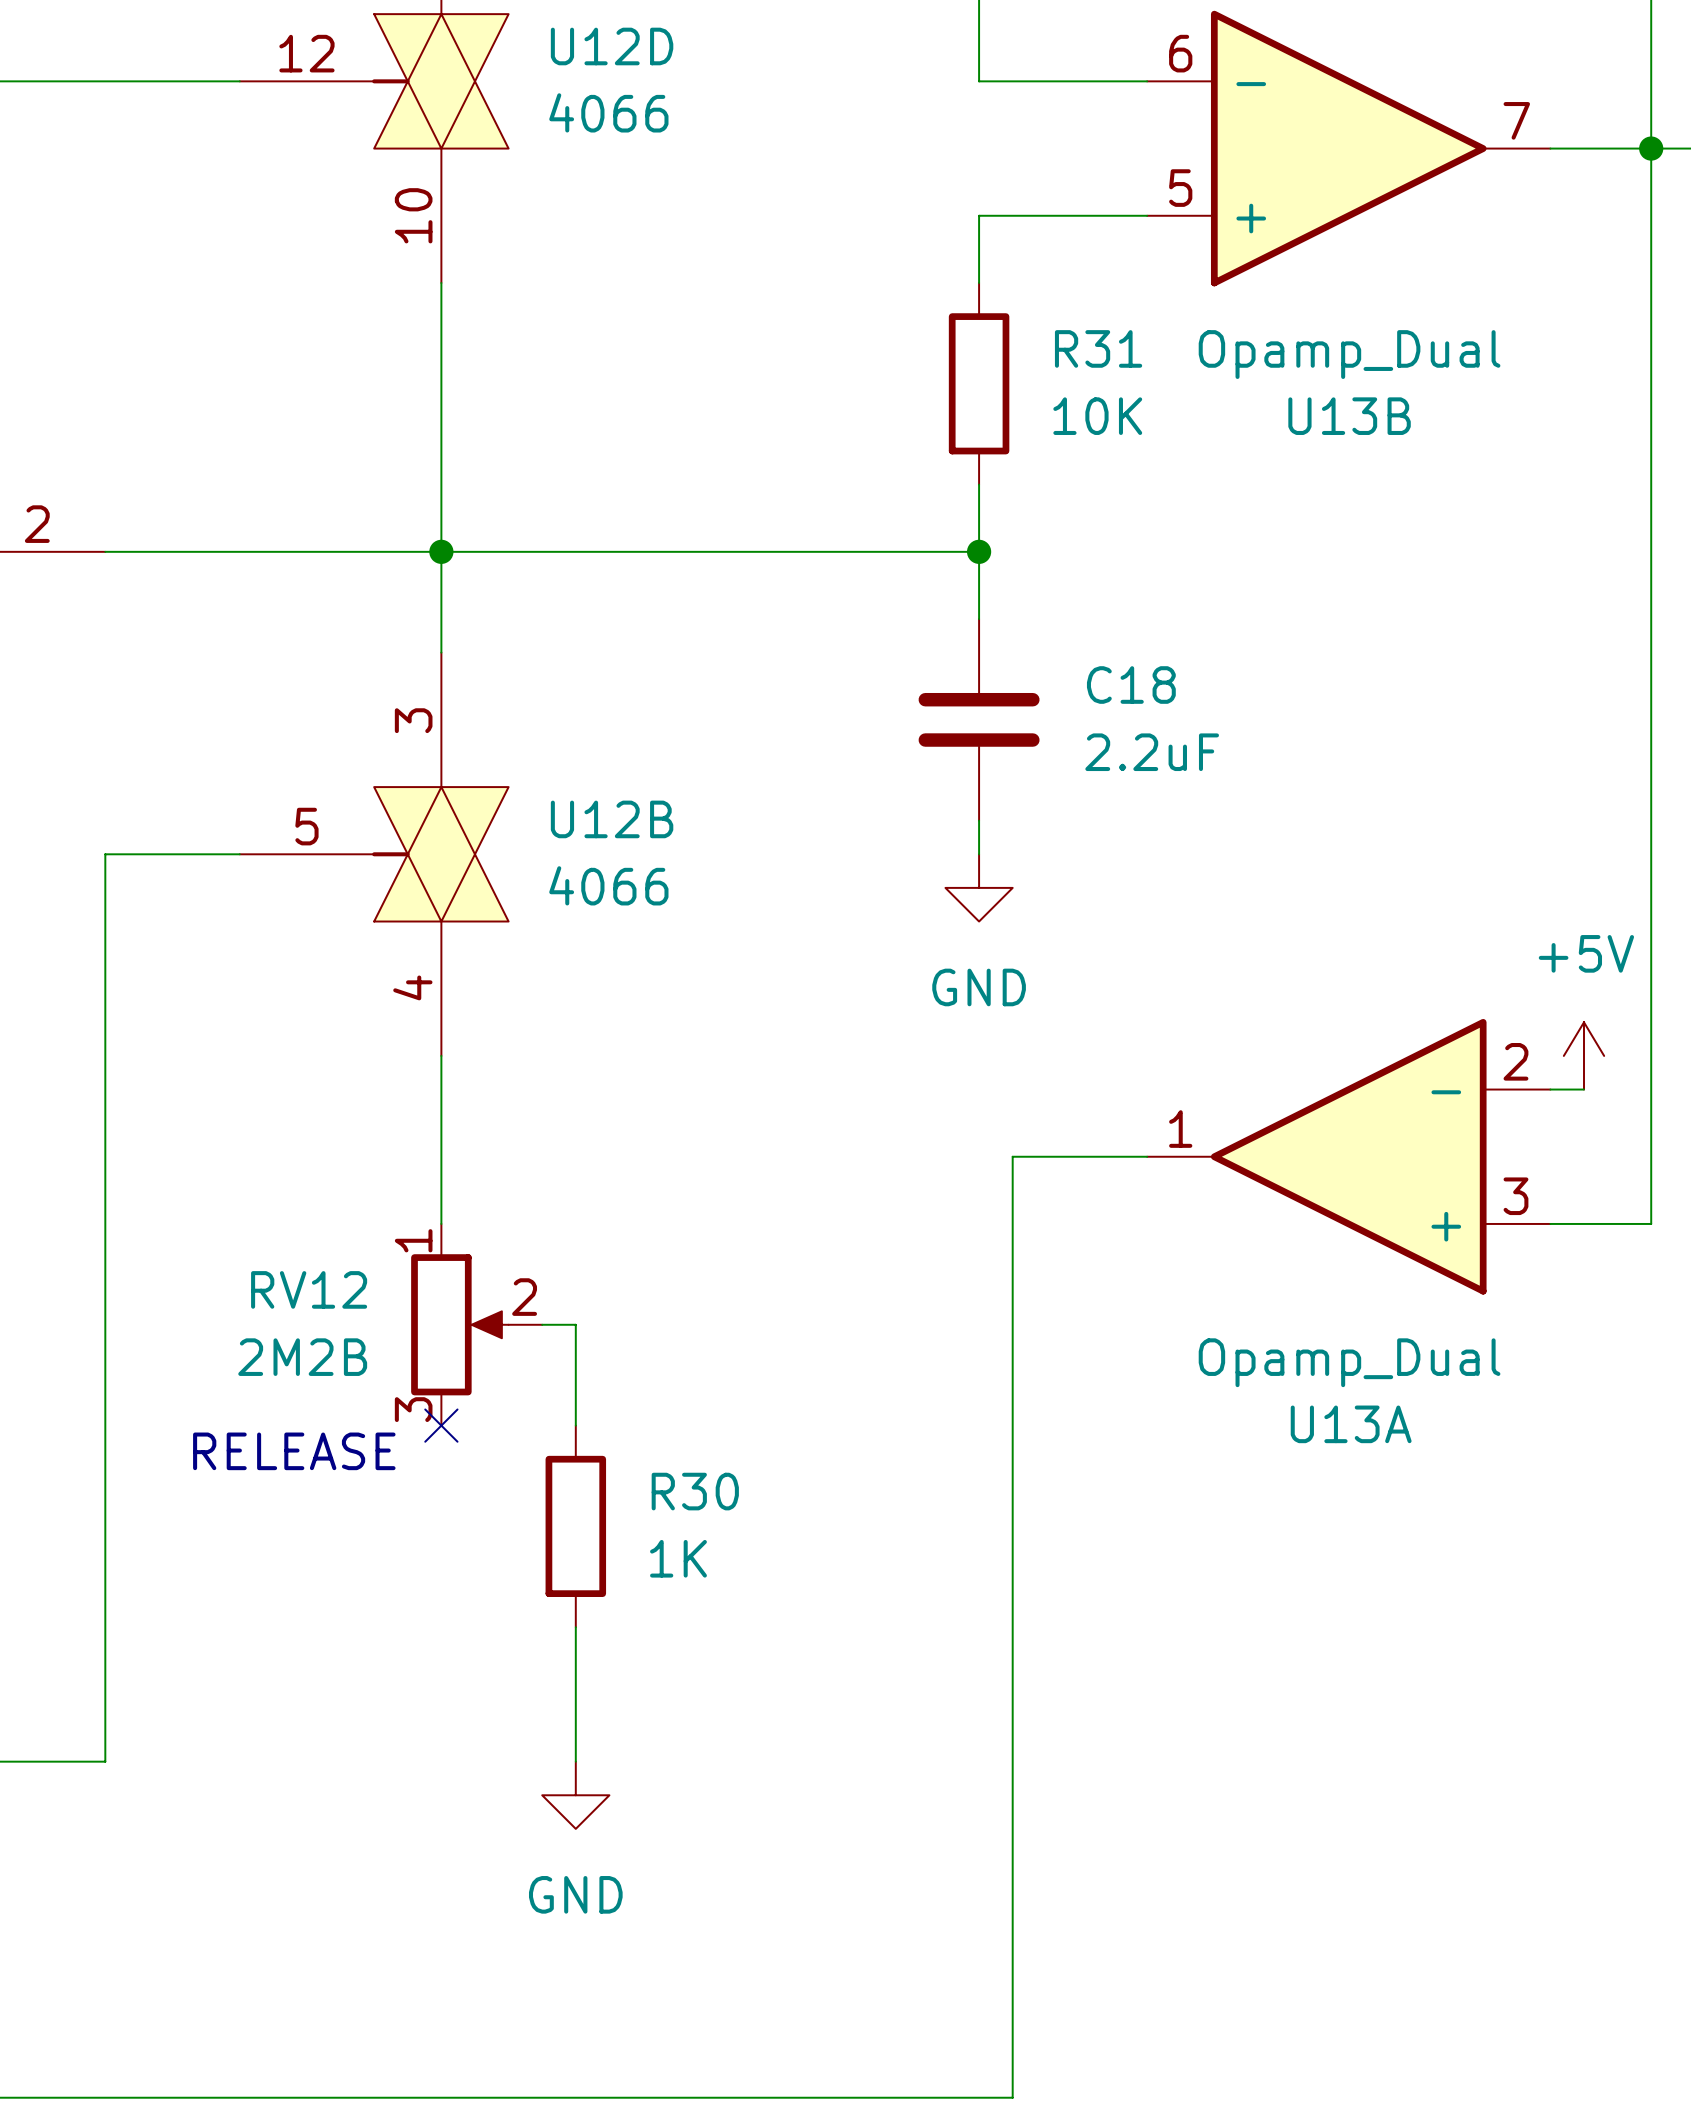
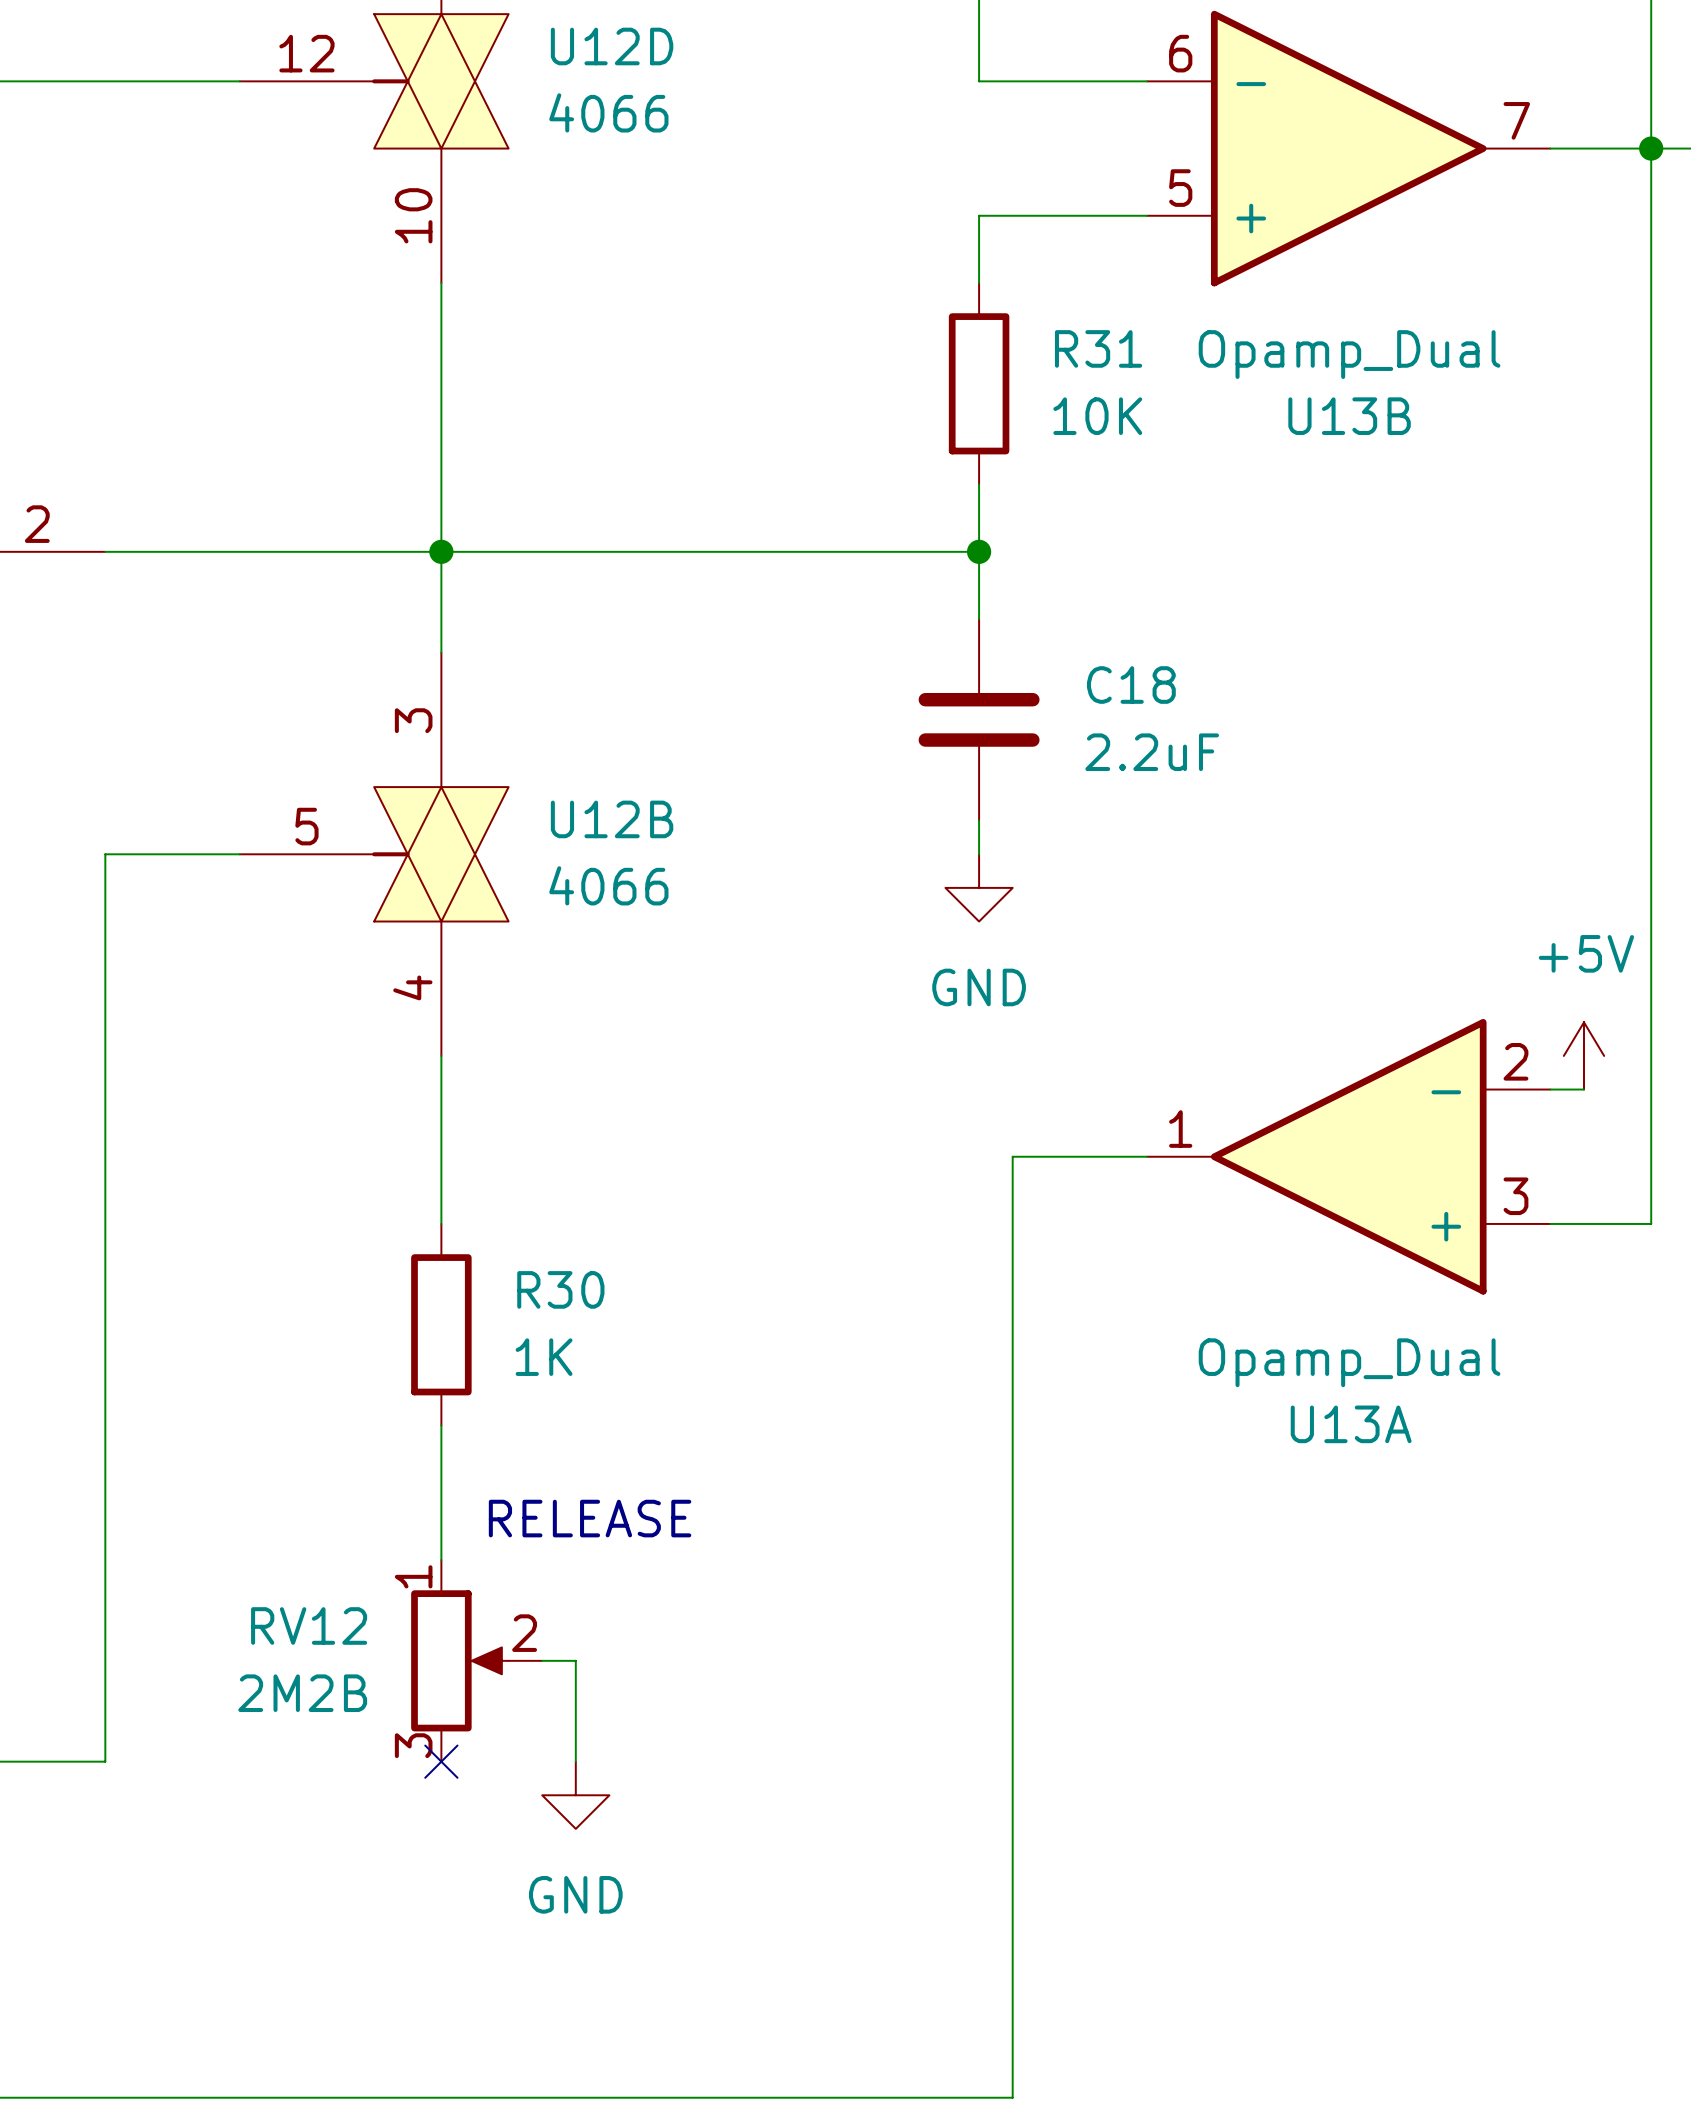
RV12 position: (476, 1324) -> (476, 1660)
wire: (542, 1324) (575, 1324) (575, 1425) -> none
wire: none -> (441, 1425) (441, 1560)
no-connect mark: (441, 1425) -> none
text position: RELEASE (294, 1451) -> RELEASE (590, 1518)
R30 position: (575, 1526) -> (441, 1324)
wire: (575, 1627) (575, 1660) -> (542, 1660) (575, 1660)
no-connect mark: none -> (441, 1761)

